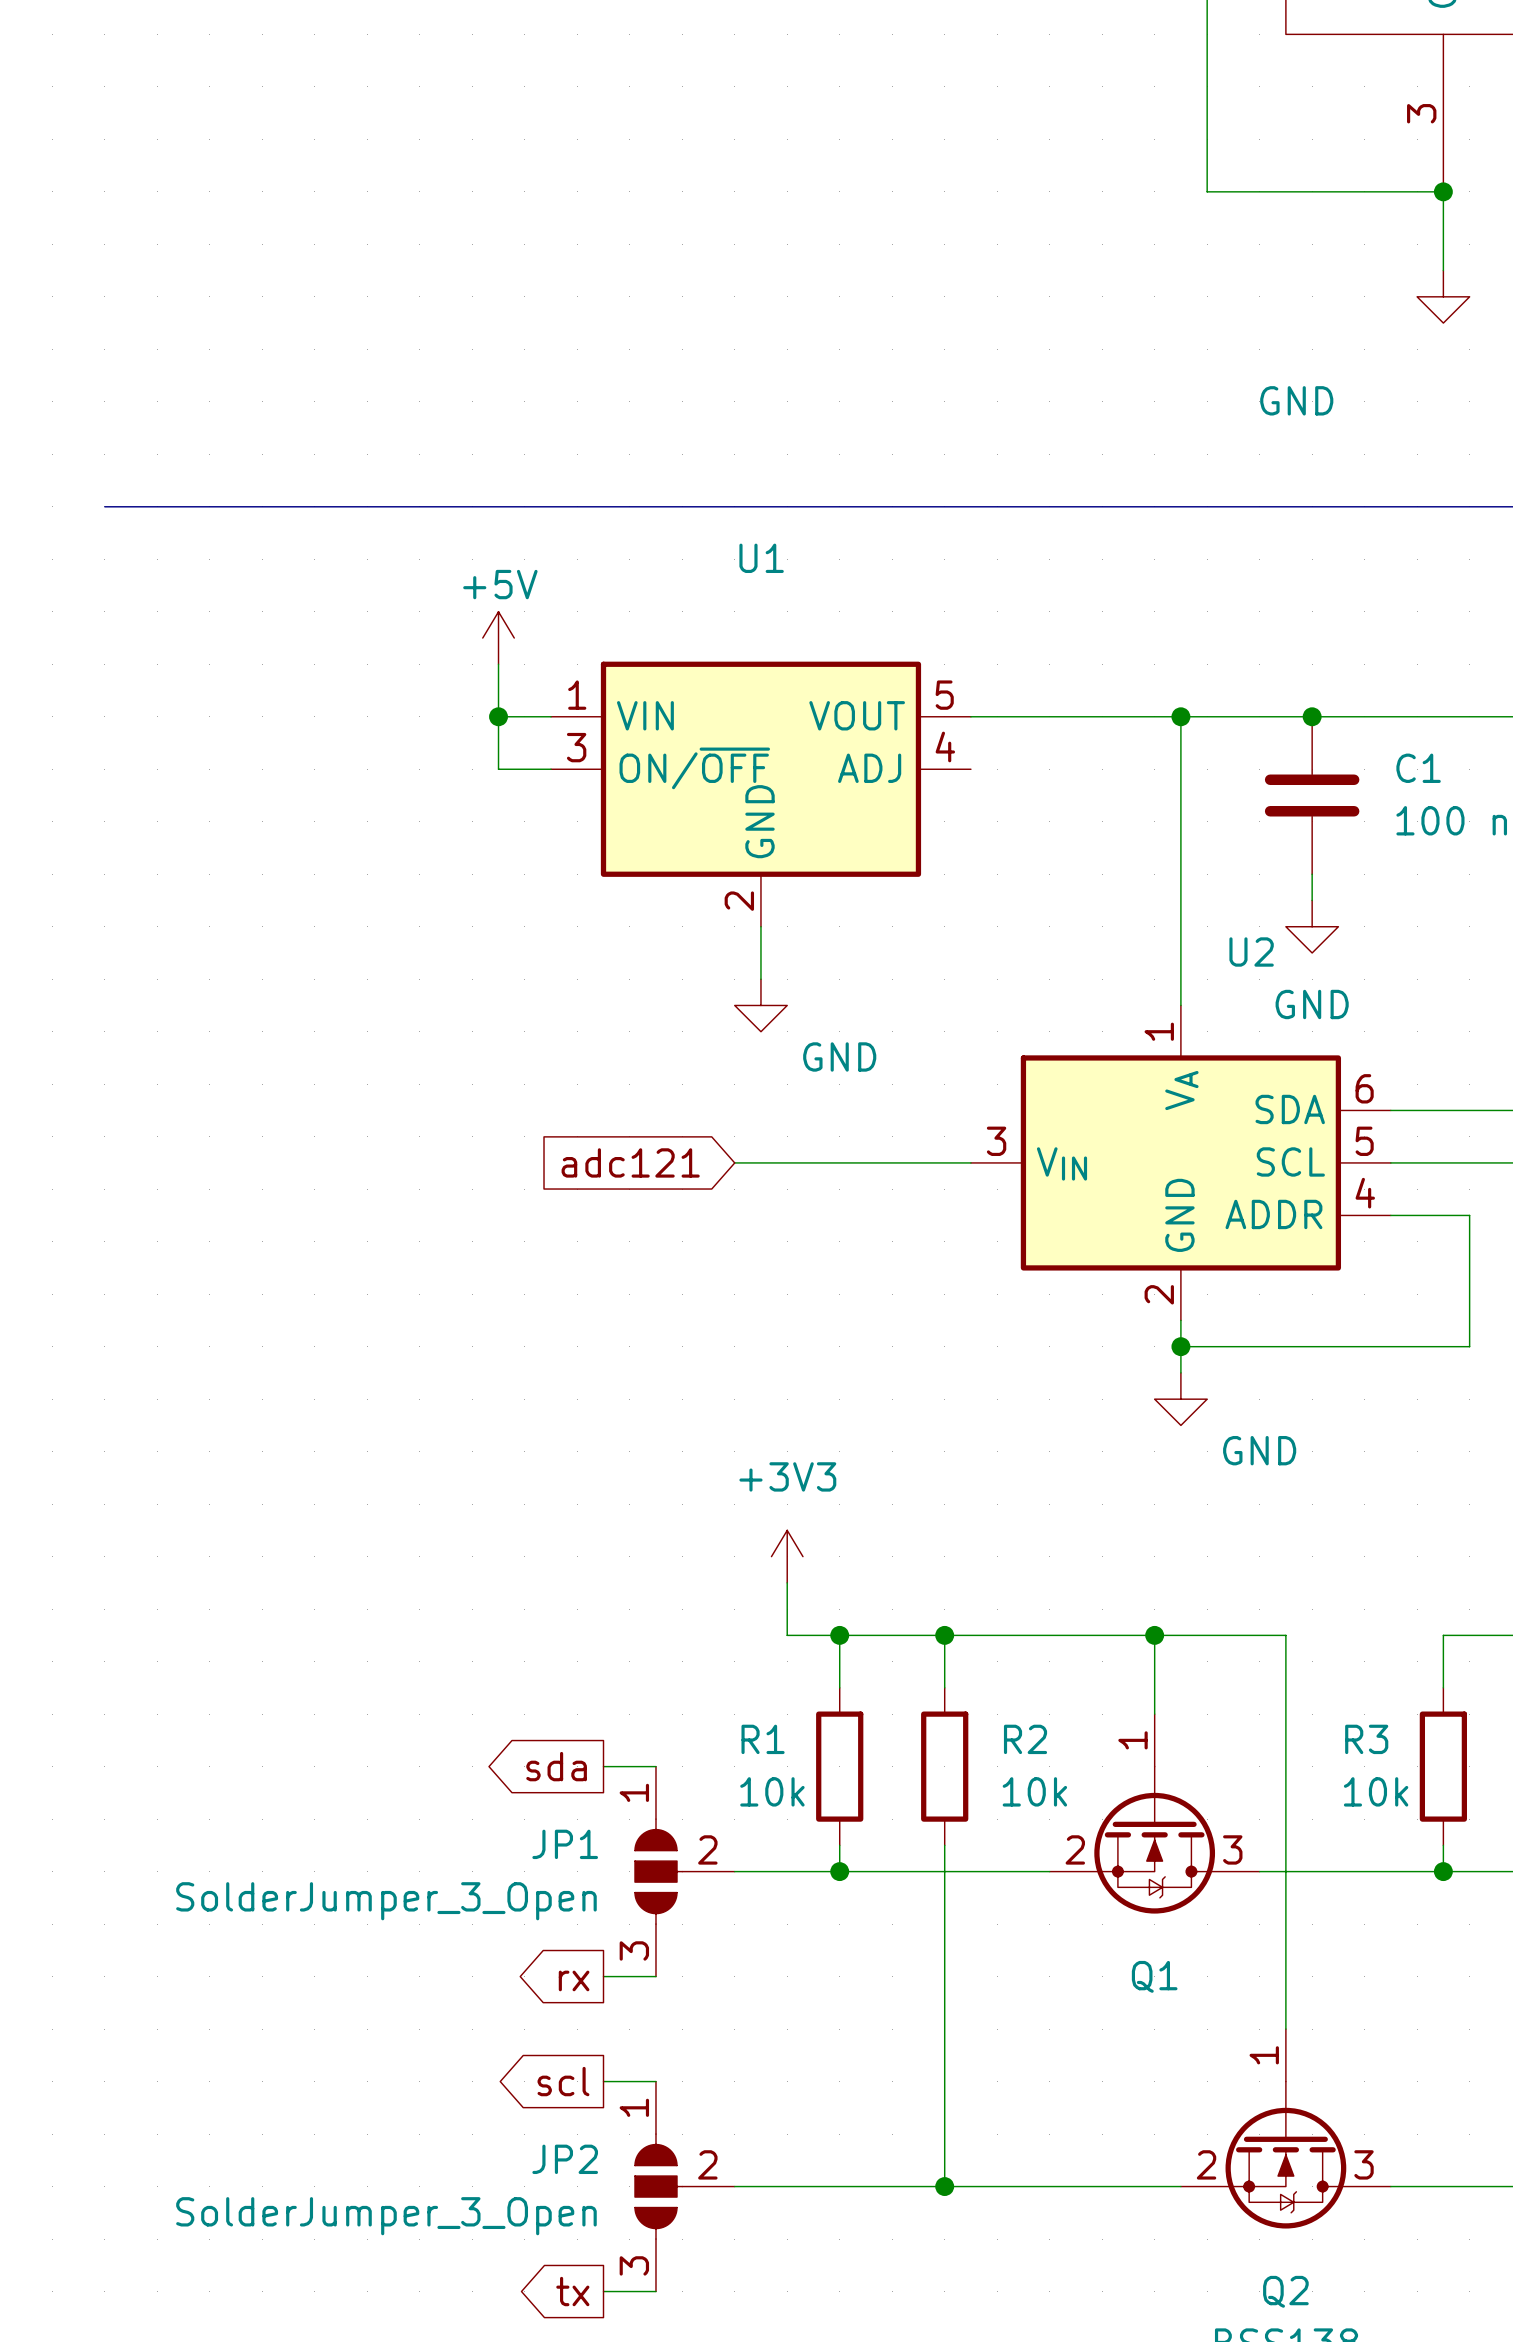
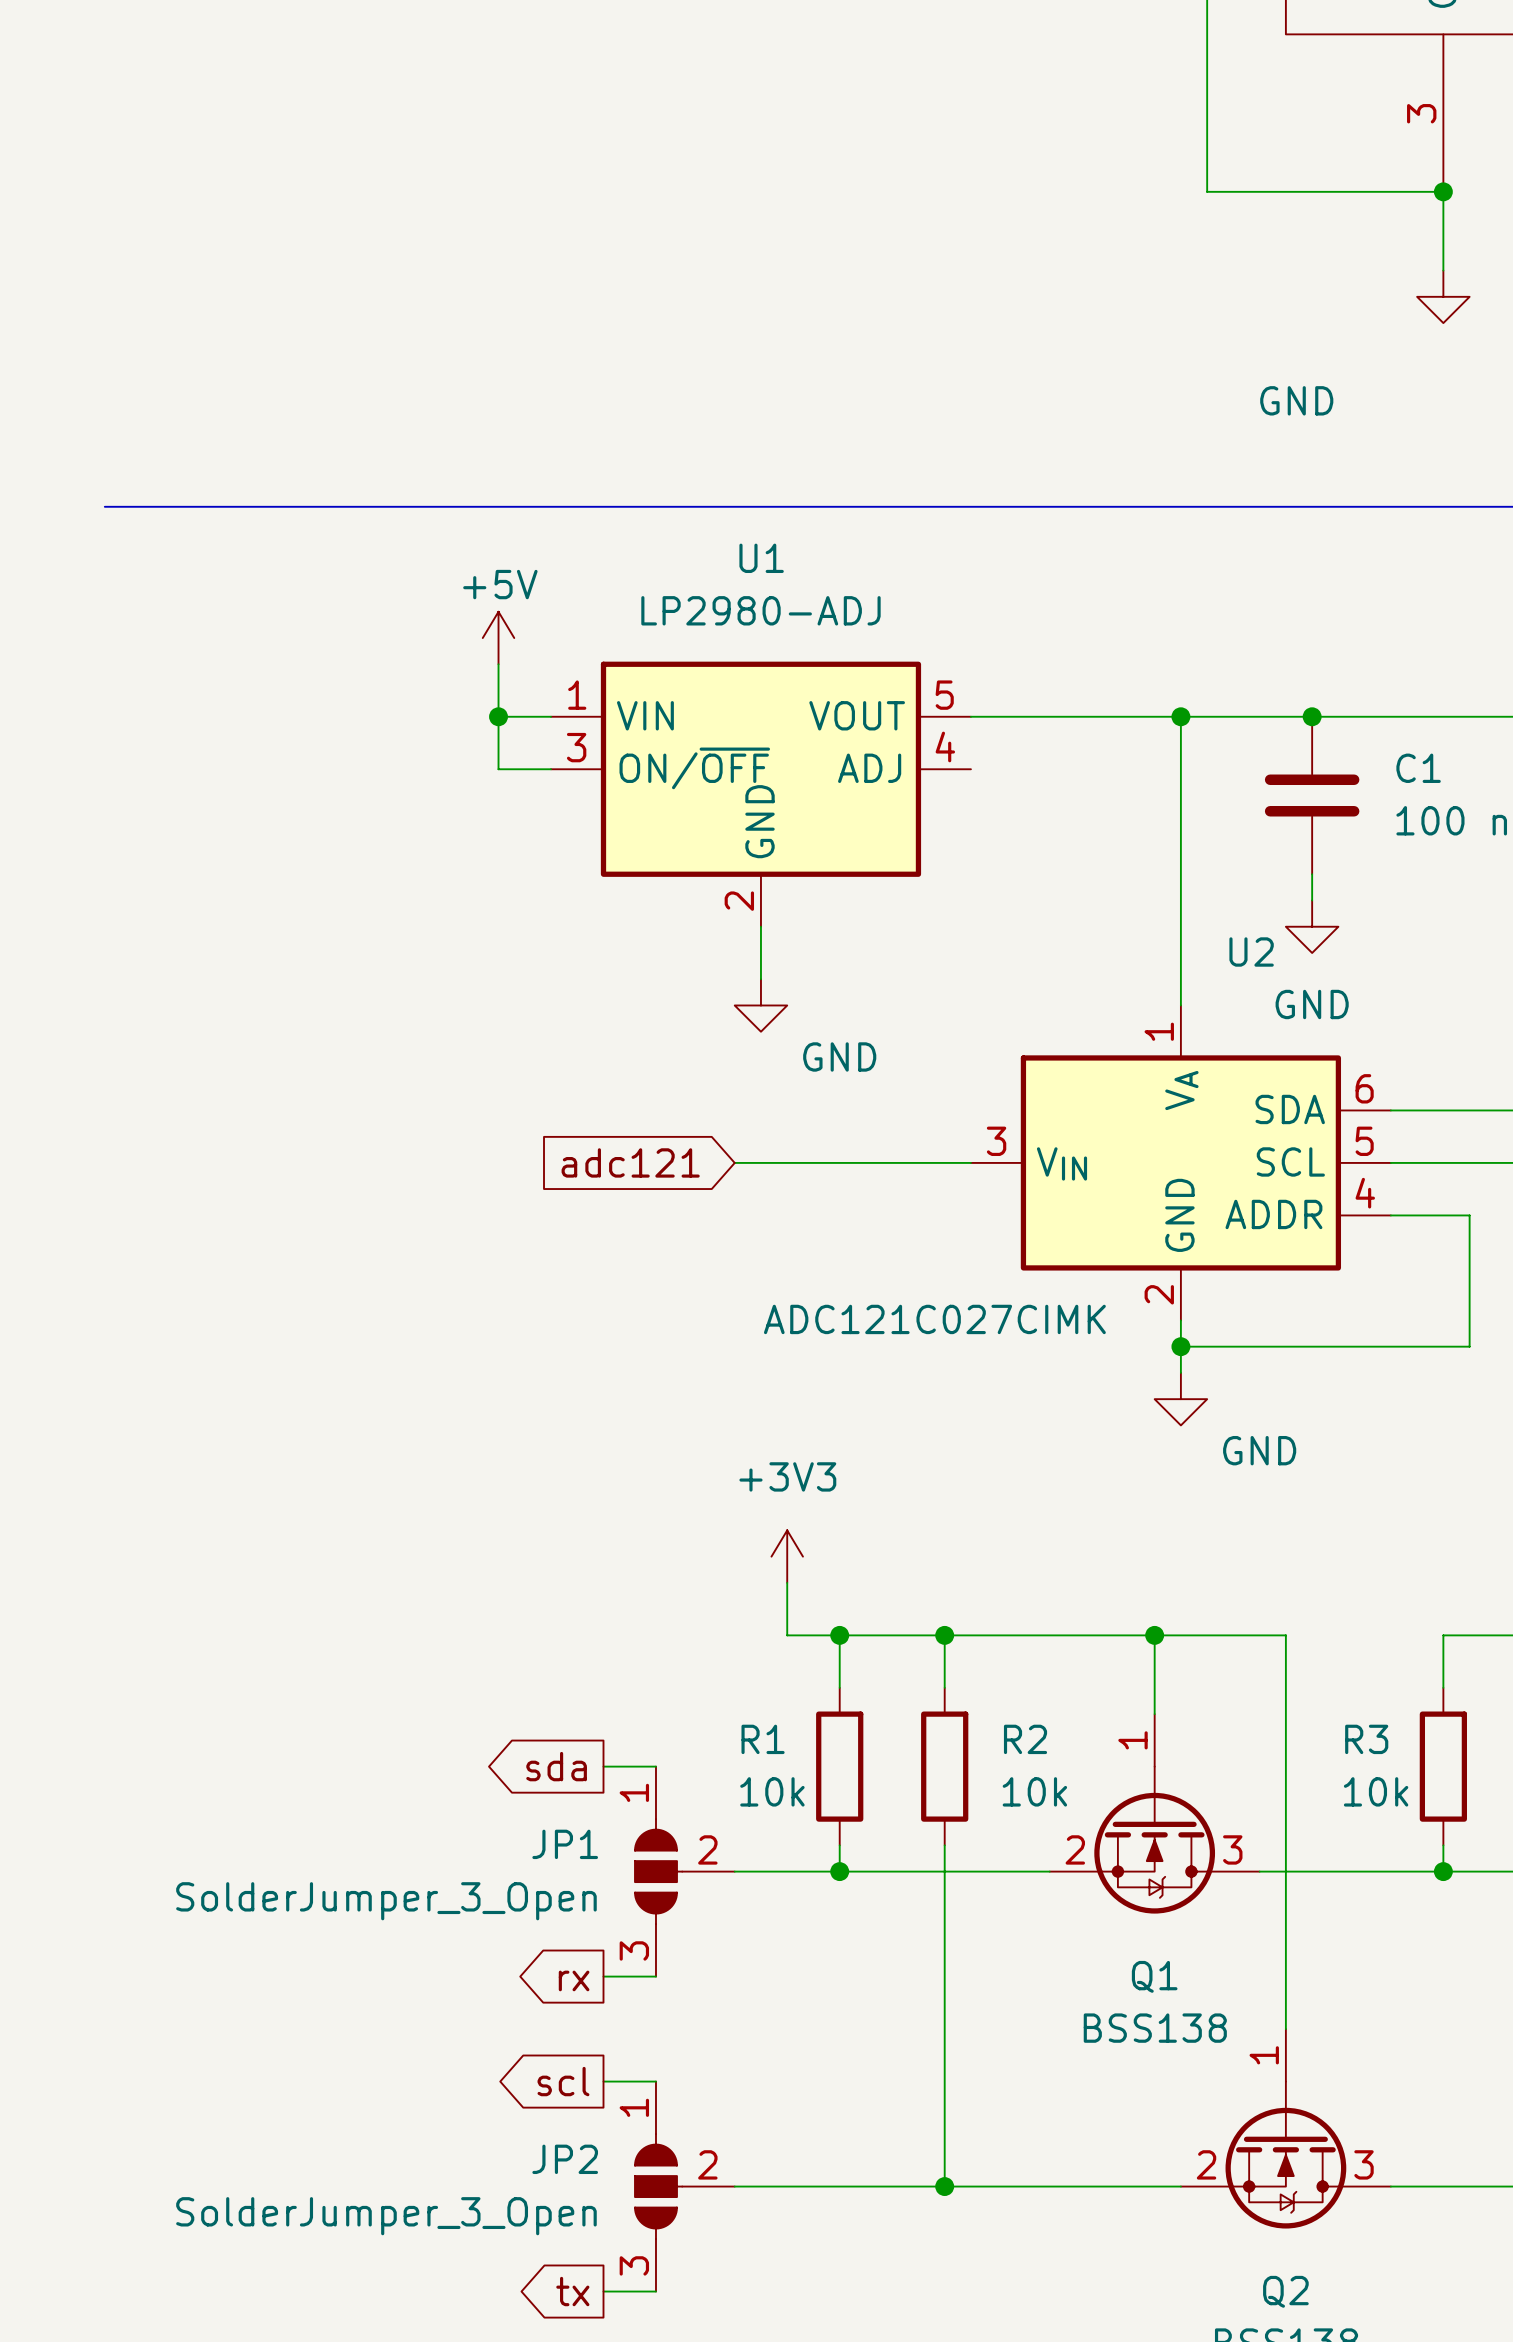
U1 value: none -> LP2980-ADJ (760, 610)
U2 value: none -> ADC121C027CIMK (934, 1319)
Q1 value: none -> BSS138 (1155, 2028)

